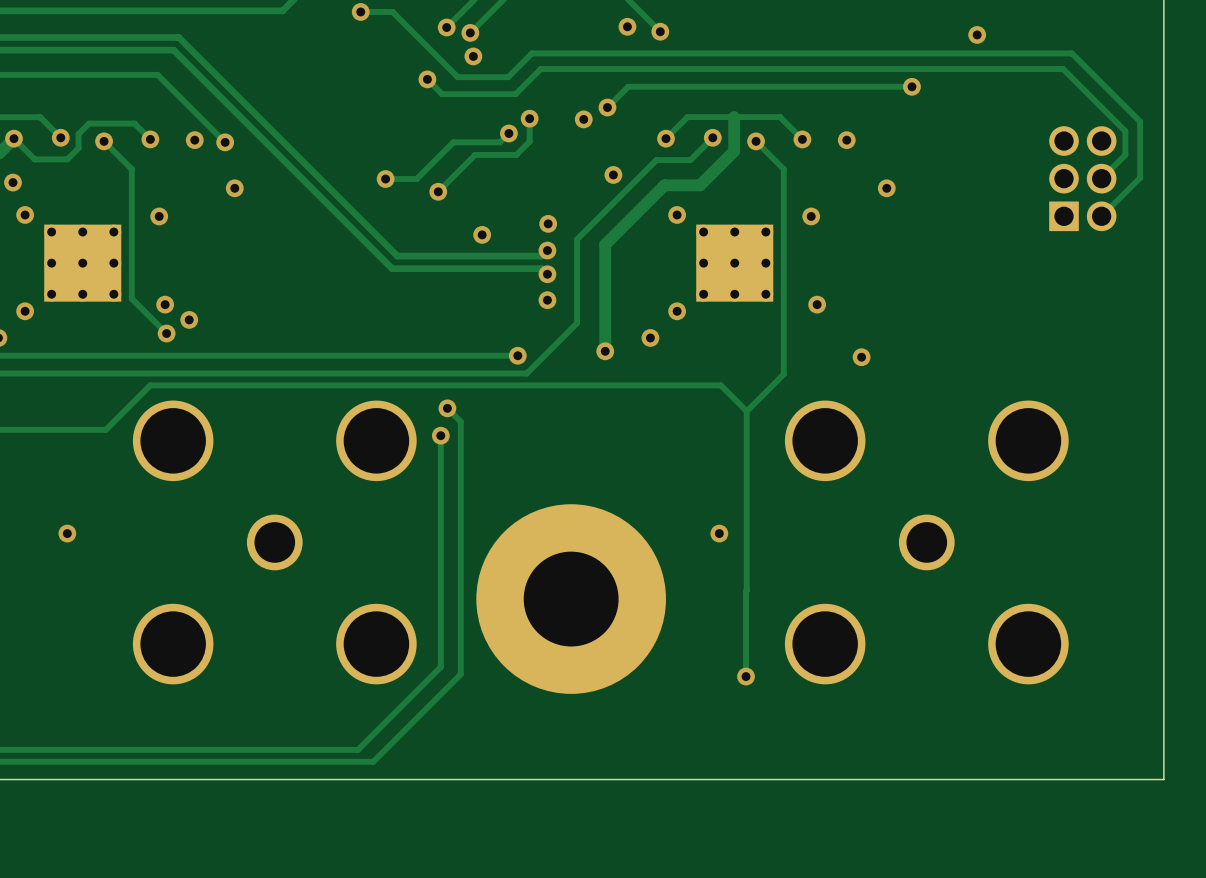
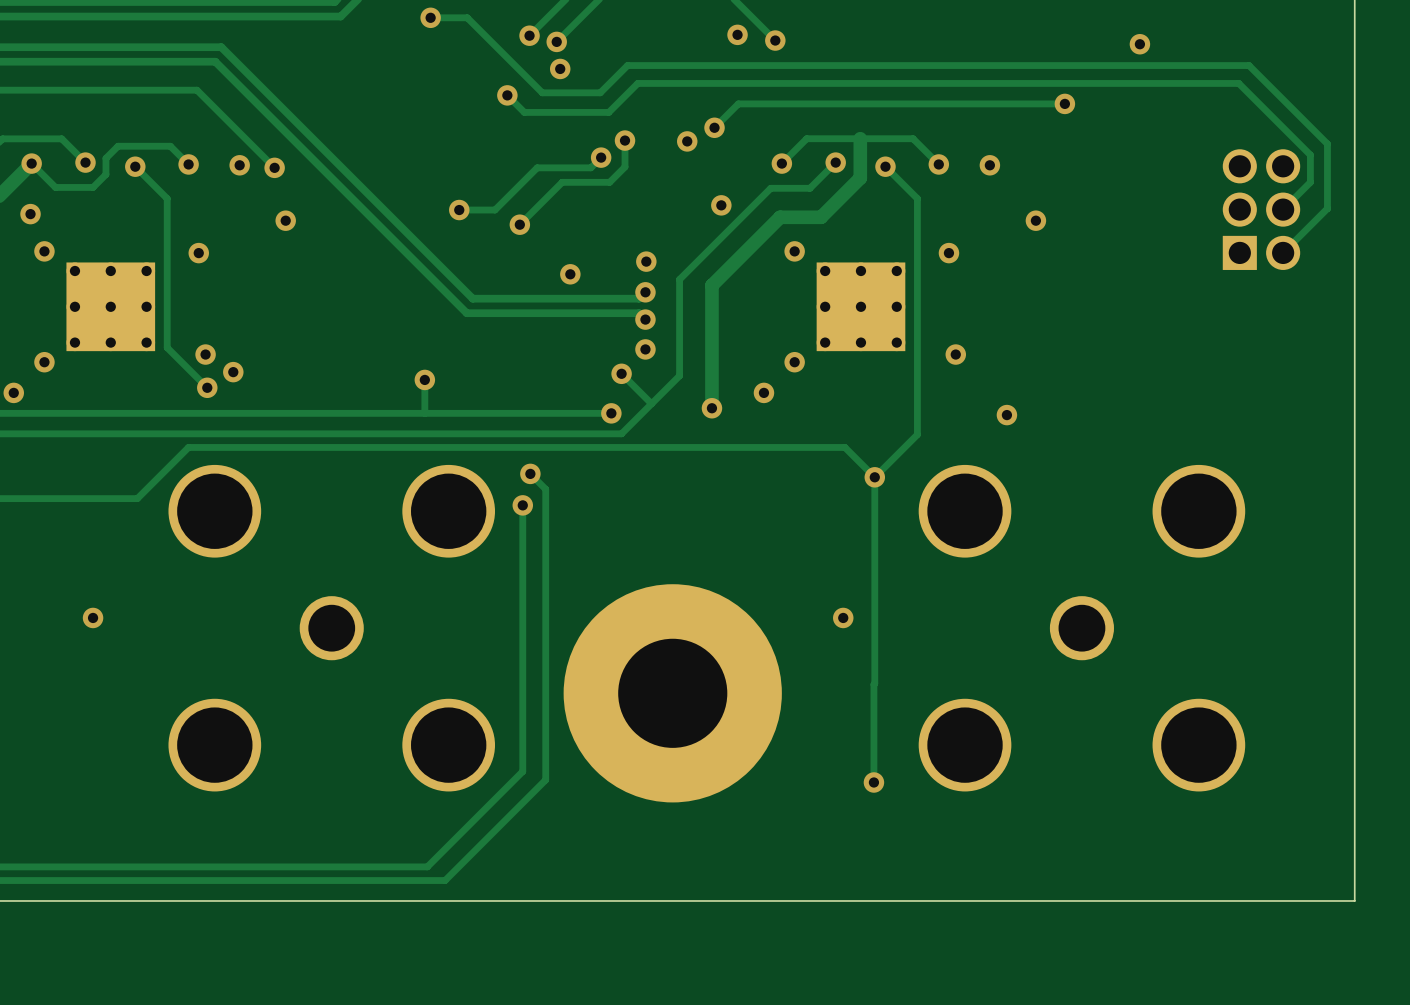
track: none -> (621, 373) (651, 403)
via: none -> (621, 373)
track: none -> (424, 379) (424, 413)
via: none -> (424, 379)
via: none -> (874, 477)

